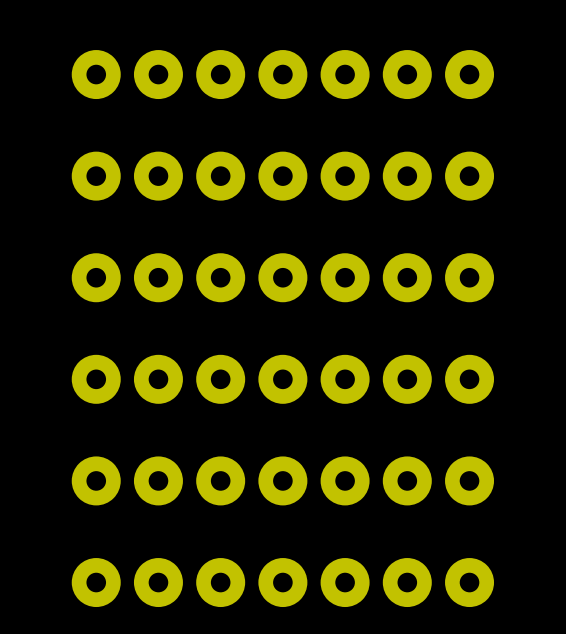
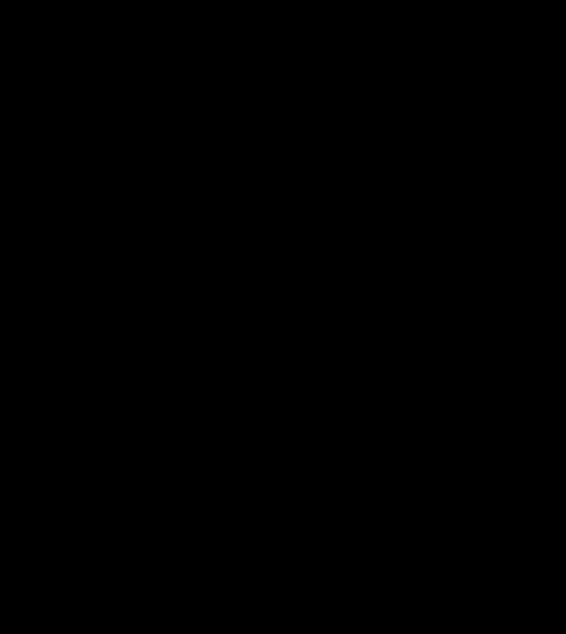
part: (282, 74) -> none
part: (282, 176) -> none
part: (282, 277) -> none
part: (282, 379) -> none
part: (282, 480) -> none
part: (282, 582) -> none

